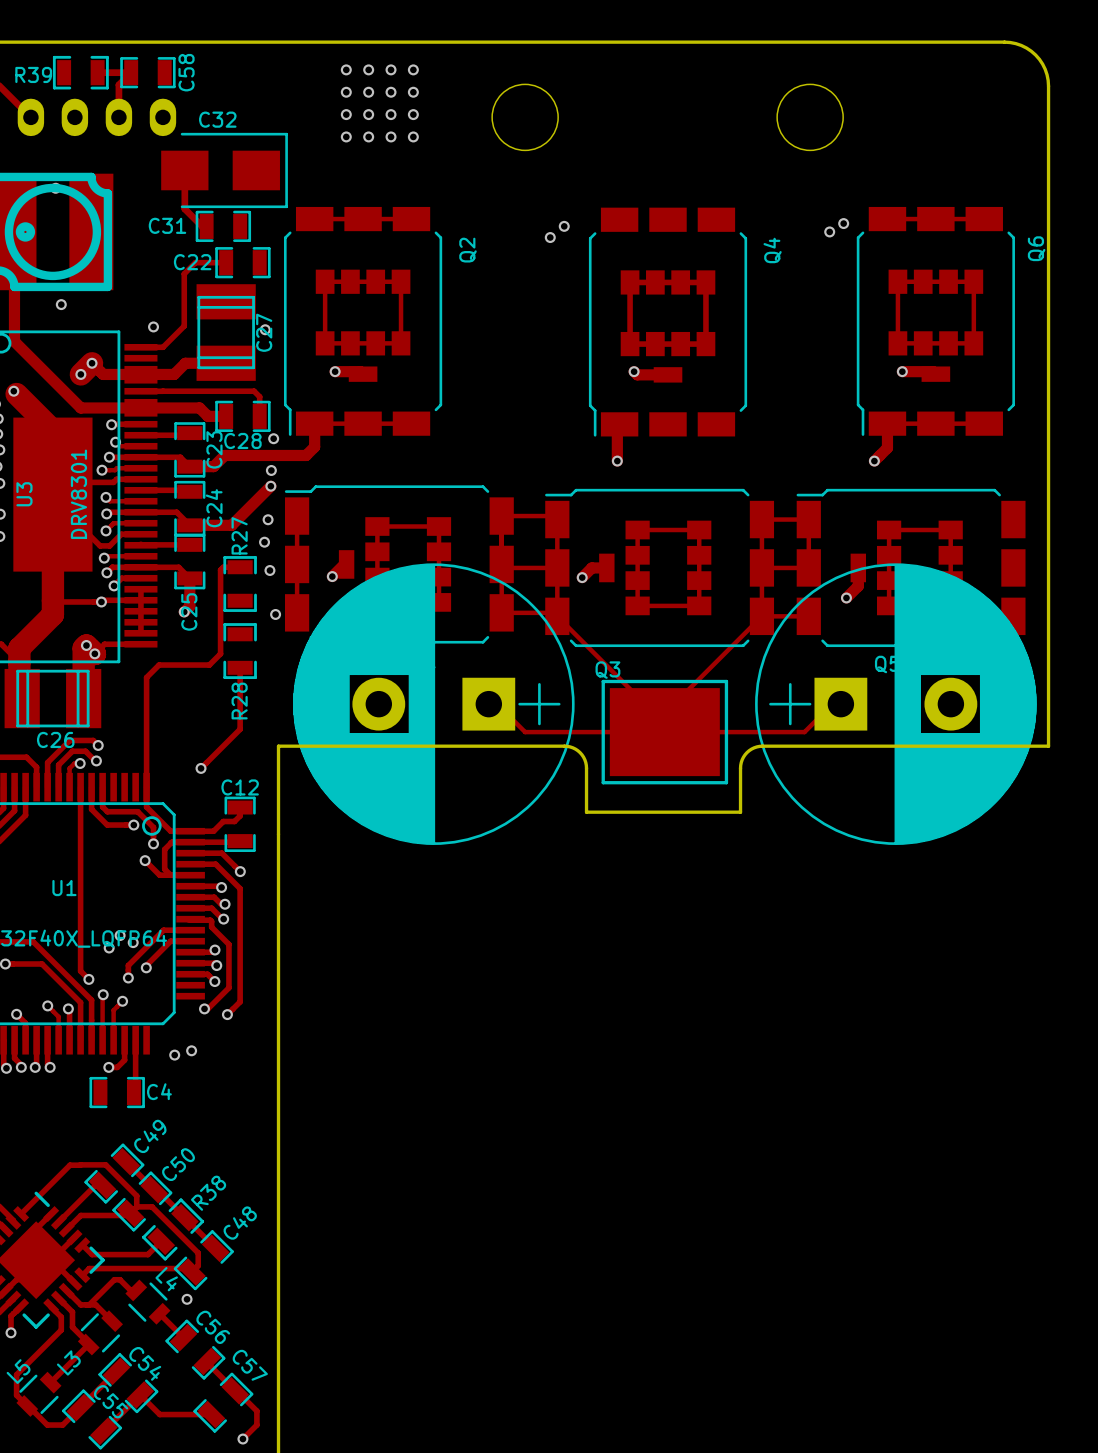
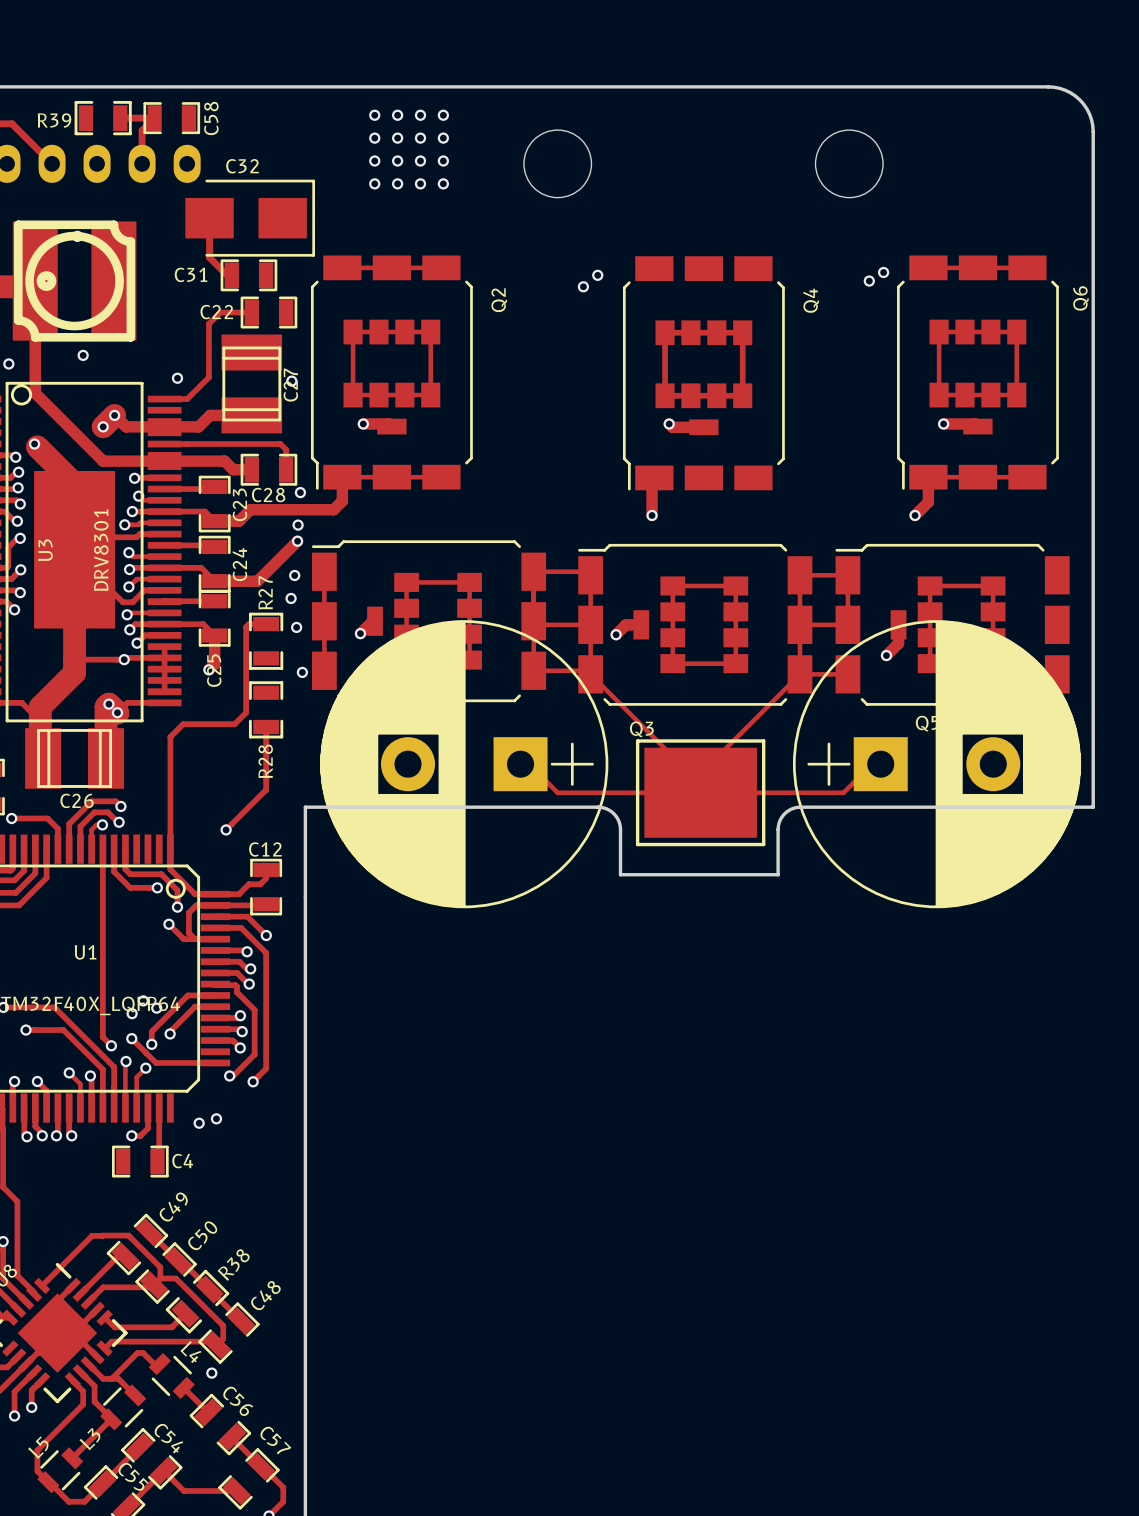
track: none -> (131, 1038) (156, 1062) (215, 1062)
via: none -> (131, 1038)

